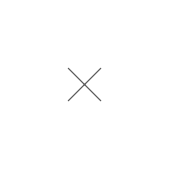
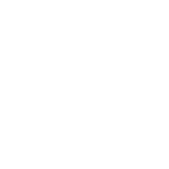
no-connect mark: (84, 84) -> none

